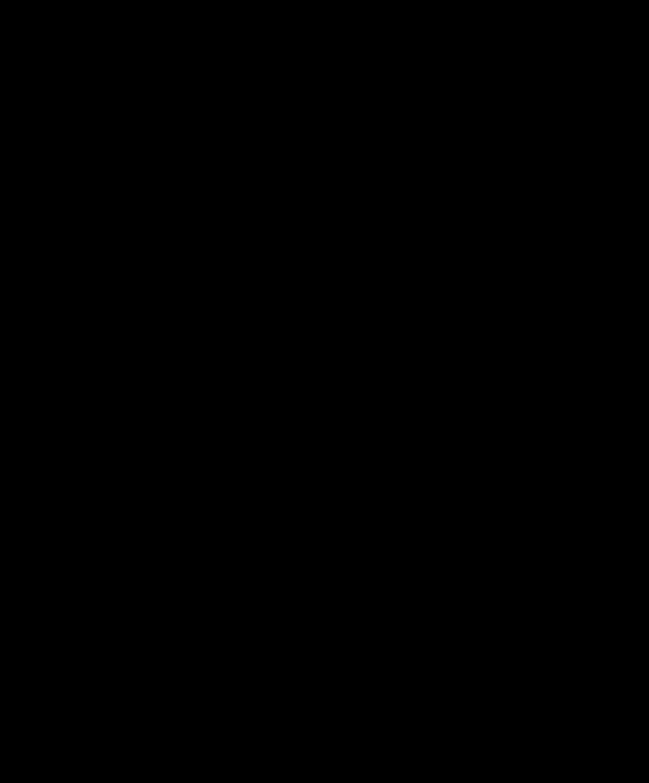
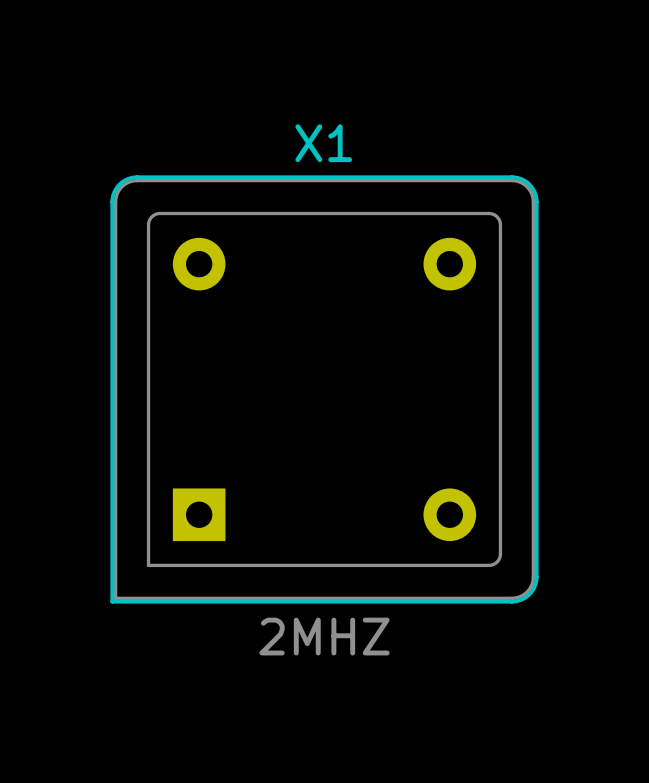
X1: none -> 2MHZ (324, 389)

